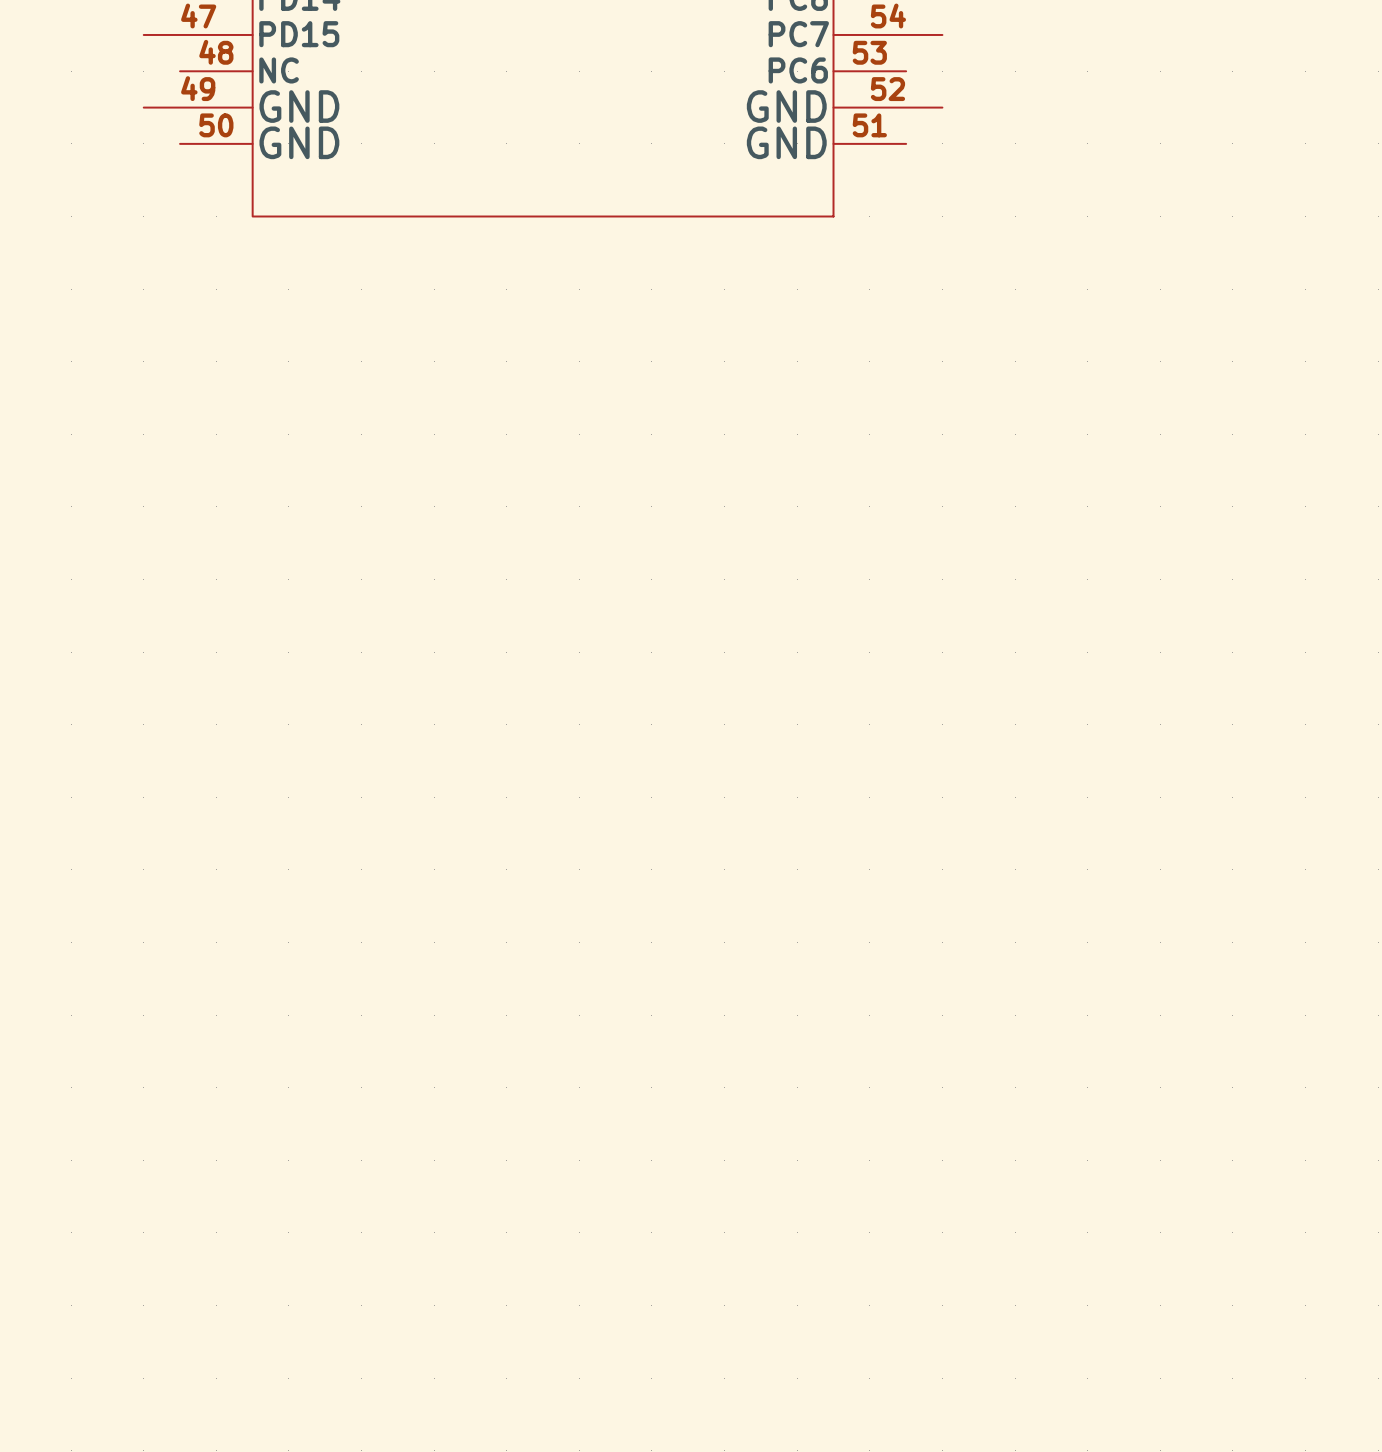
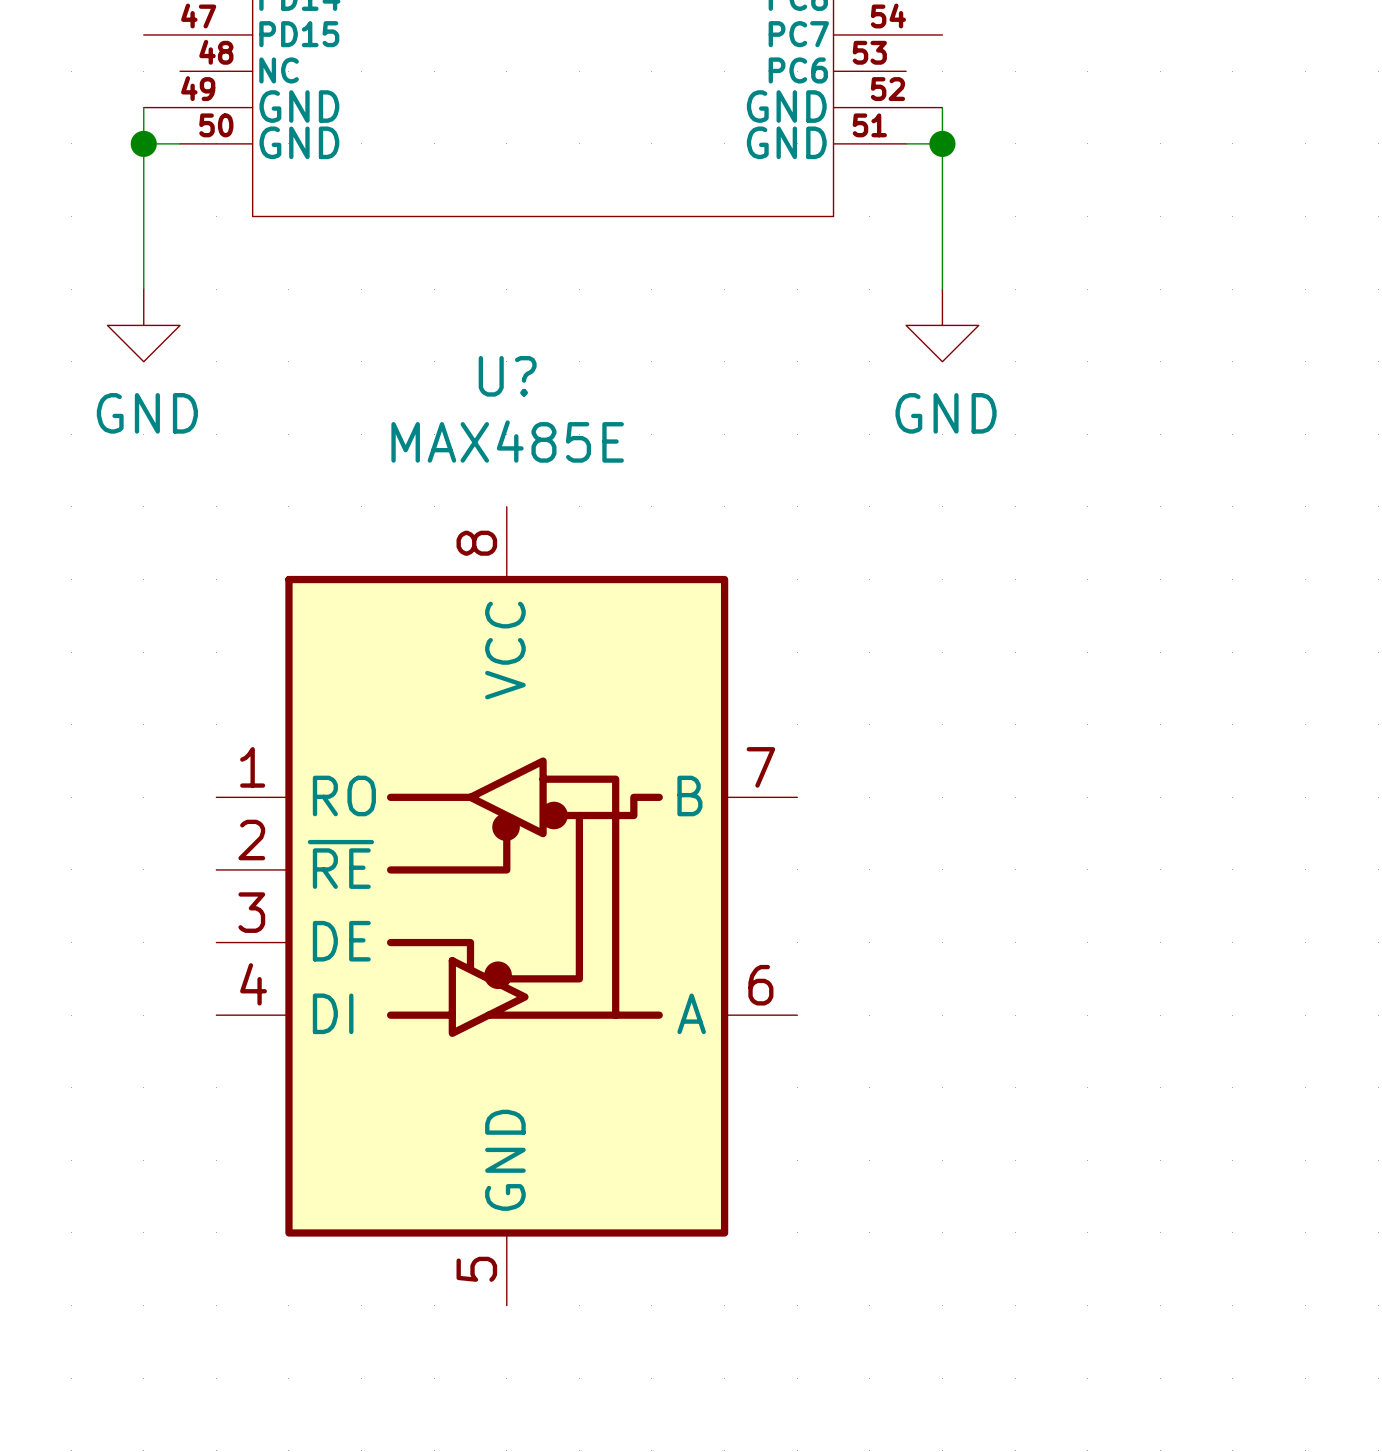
wire: none -> (143, 107) (143, 289)
wire: none -> (942, 107) (942, 289)
wire: none -> (143, 143) (180, 143)
junction: none -> (143, 143)
wire: none -> (906, 143) (942, 143)
junction: none -> (942, 143)
power symbol: none -> GND (143, 325)
power symbol: none -> GND (942, 325)
U?: none -> MAX485E (506, 906)

